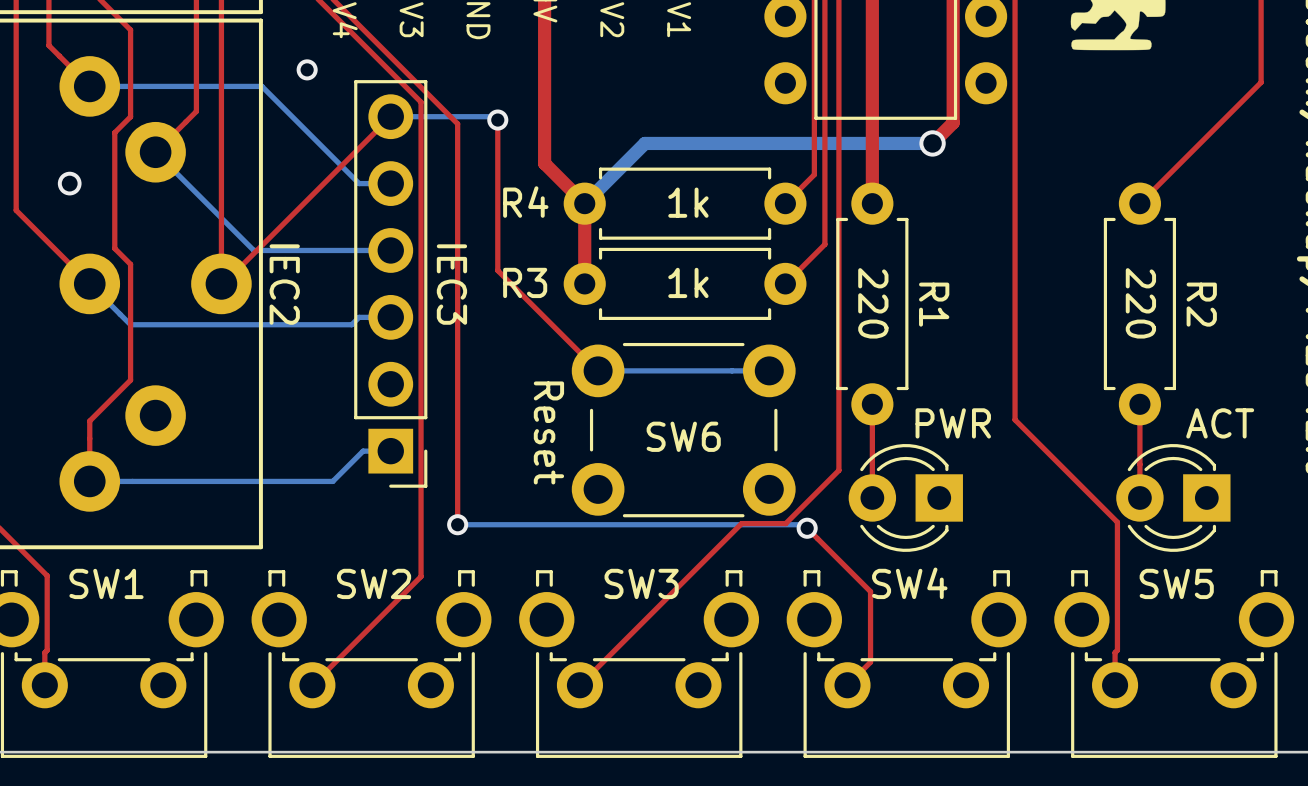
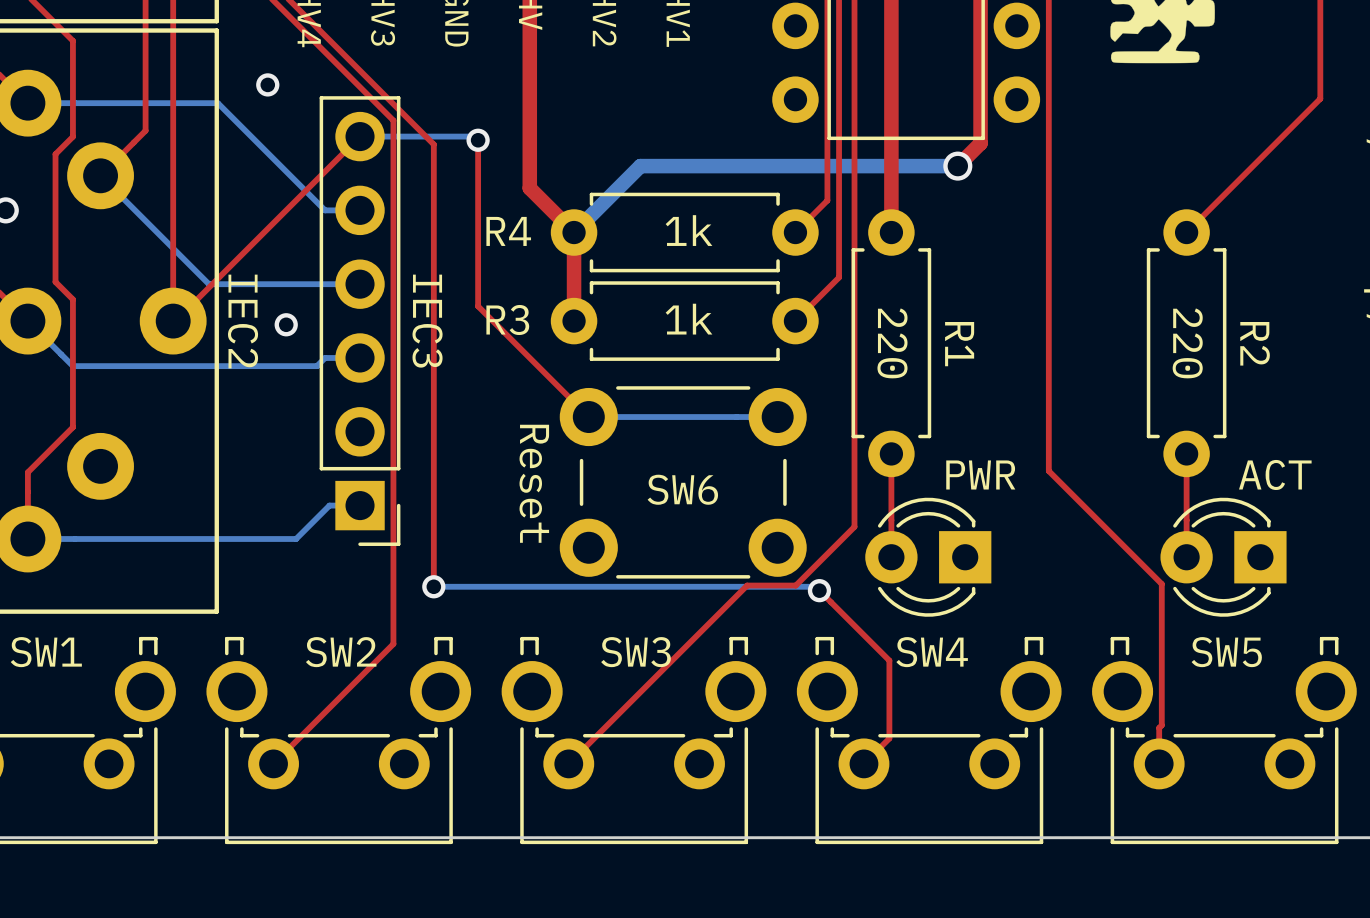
via: none -> (286, 324)

